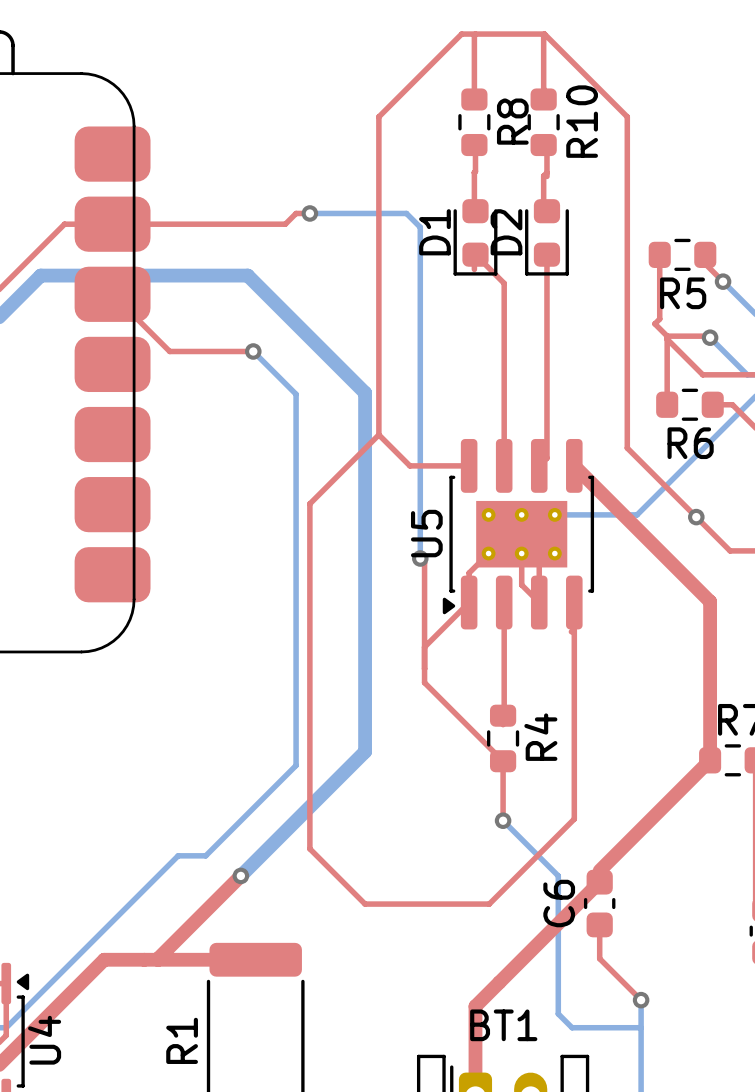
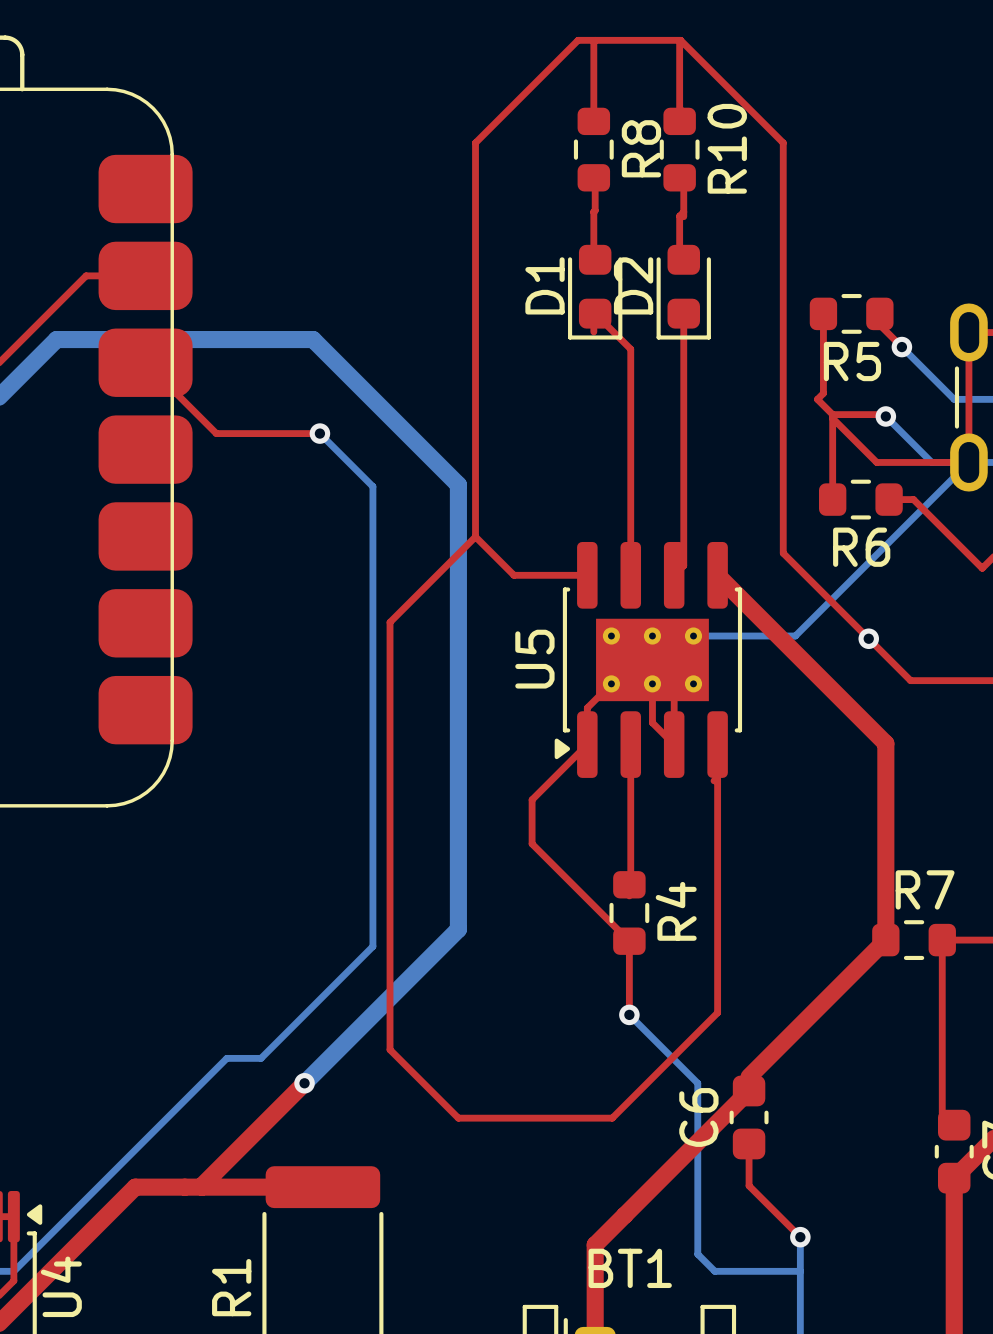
top track: (309, 213) (296, 213) (285, 224) (112, 224) -> none
bottom track: (309, 213) (406, 213) (420, 227) (420, 558) -> none
via: (309, 213) -> none
top track: (420, 558) (424, 562) (424, 647) -> none
via: (420, 558) -> none

